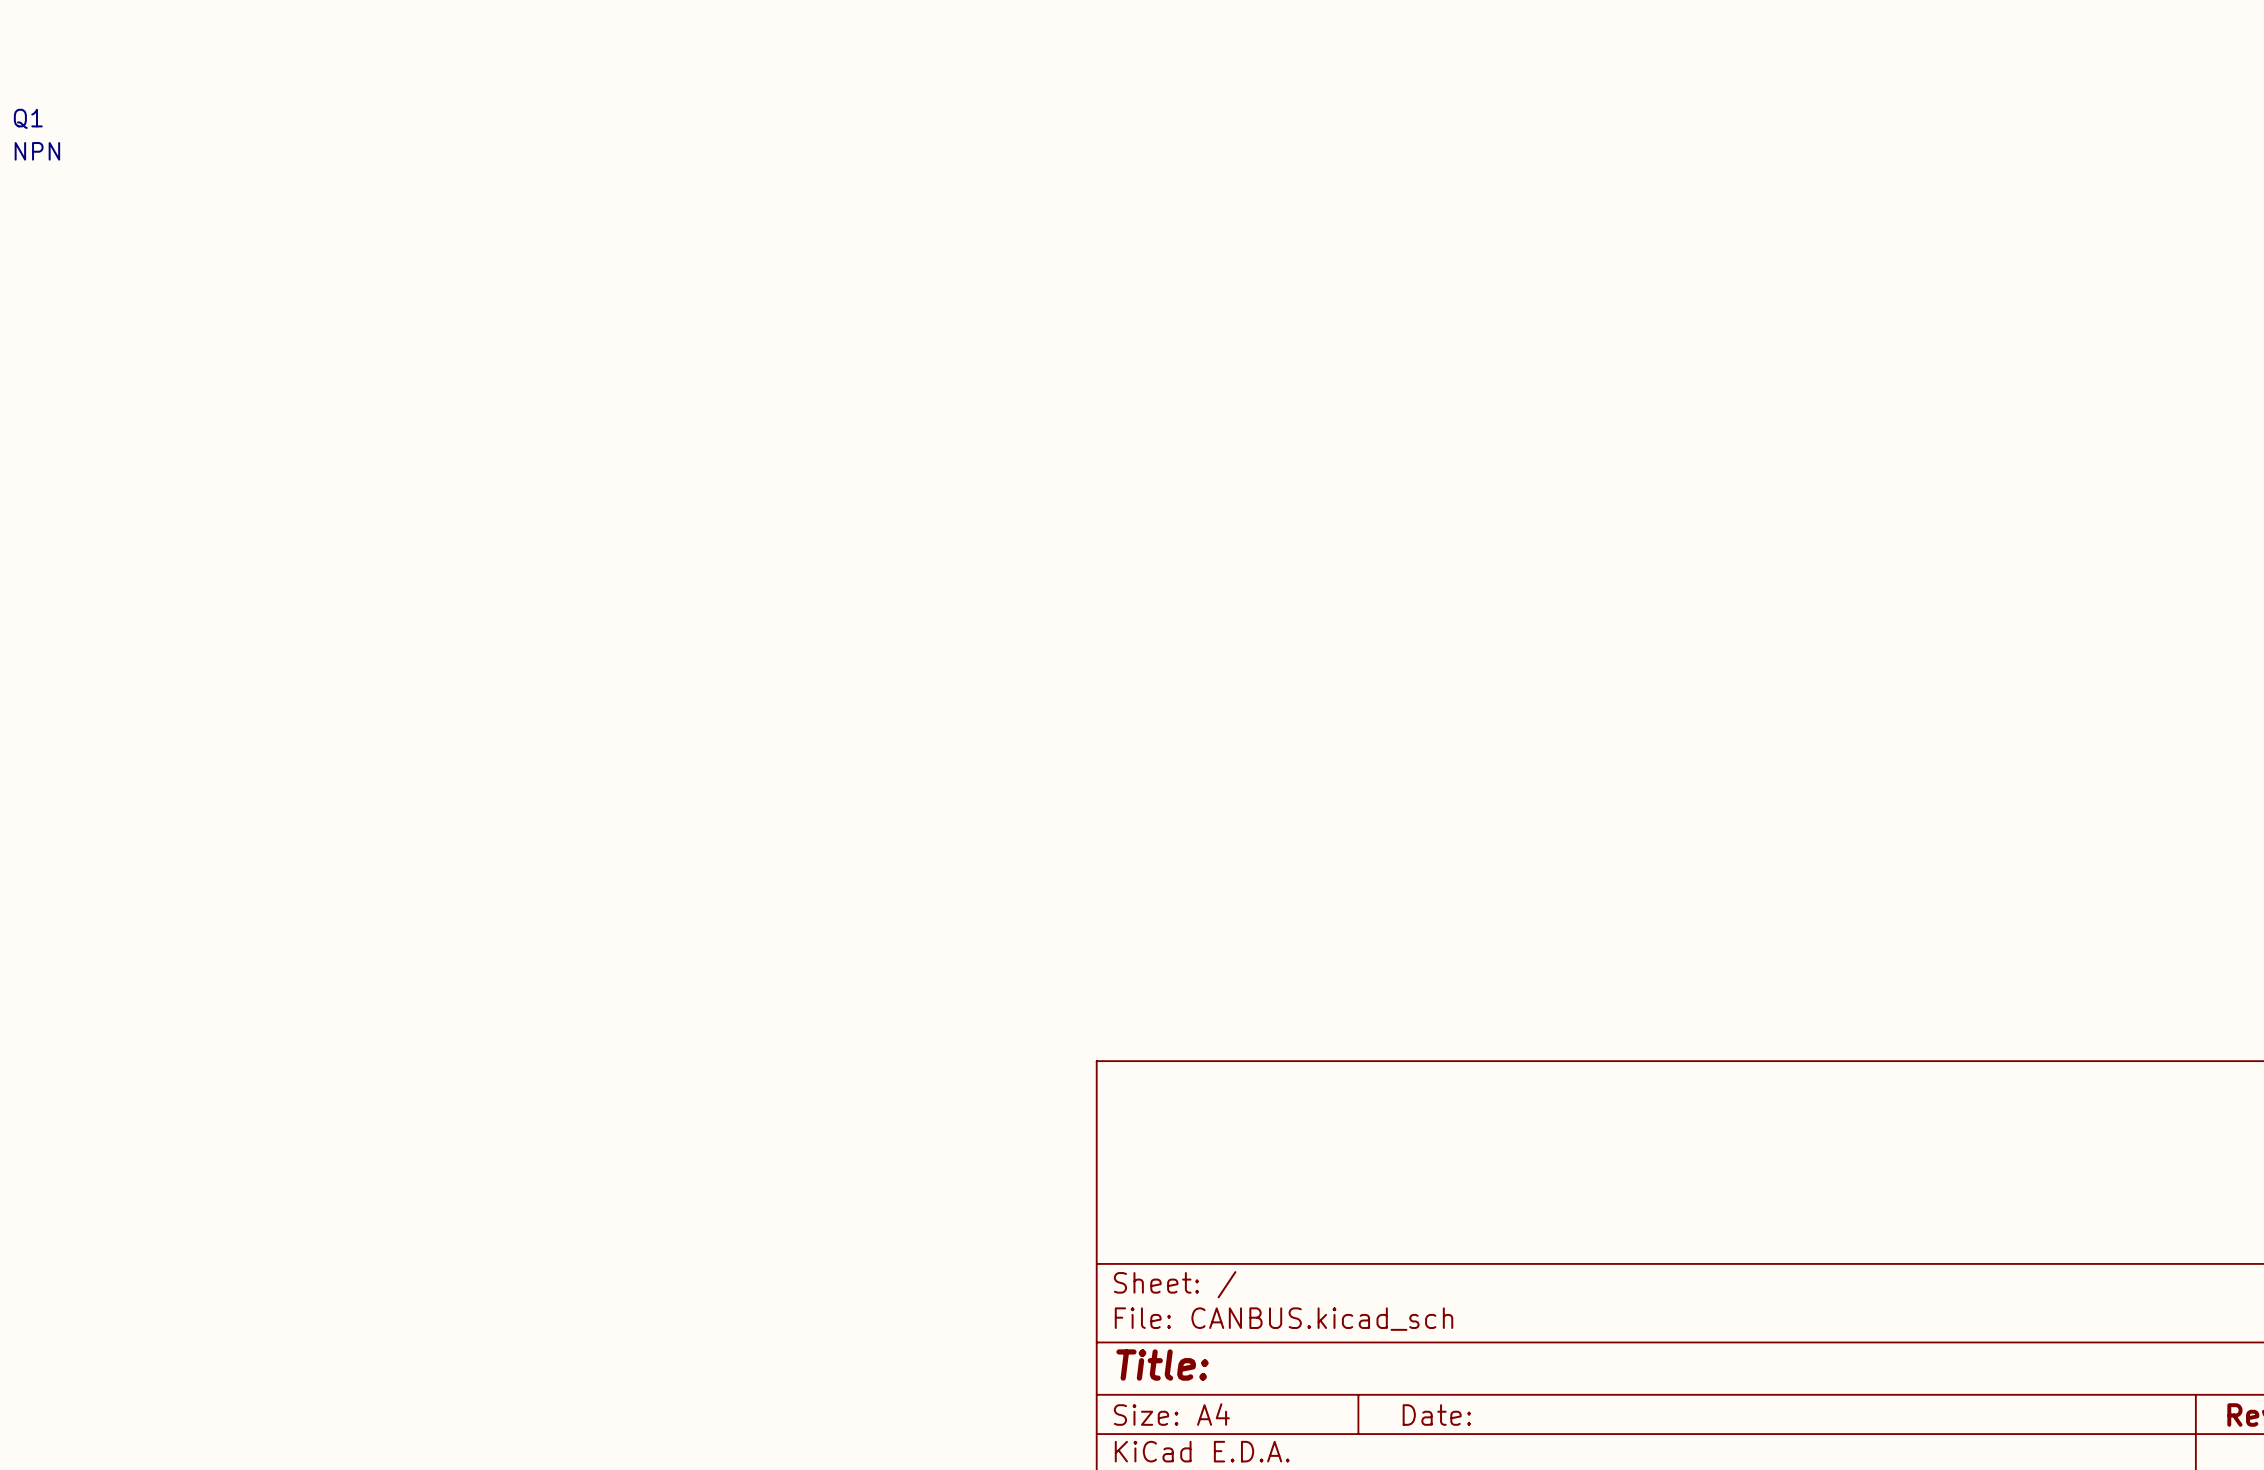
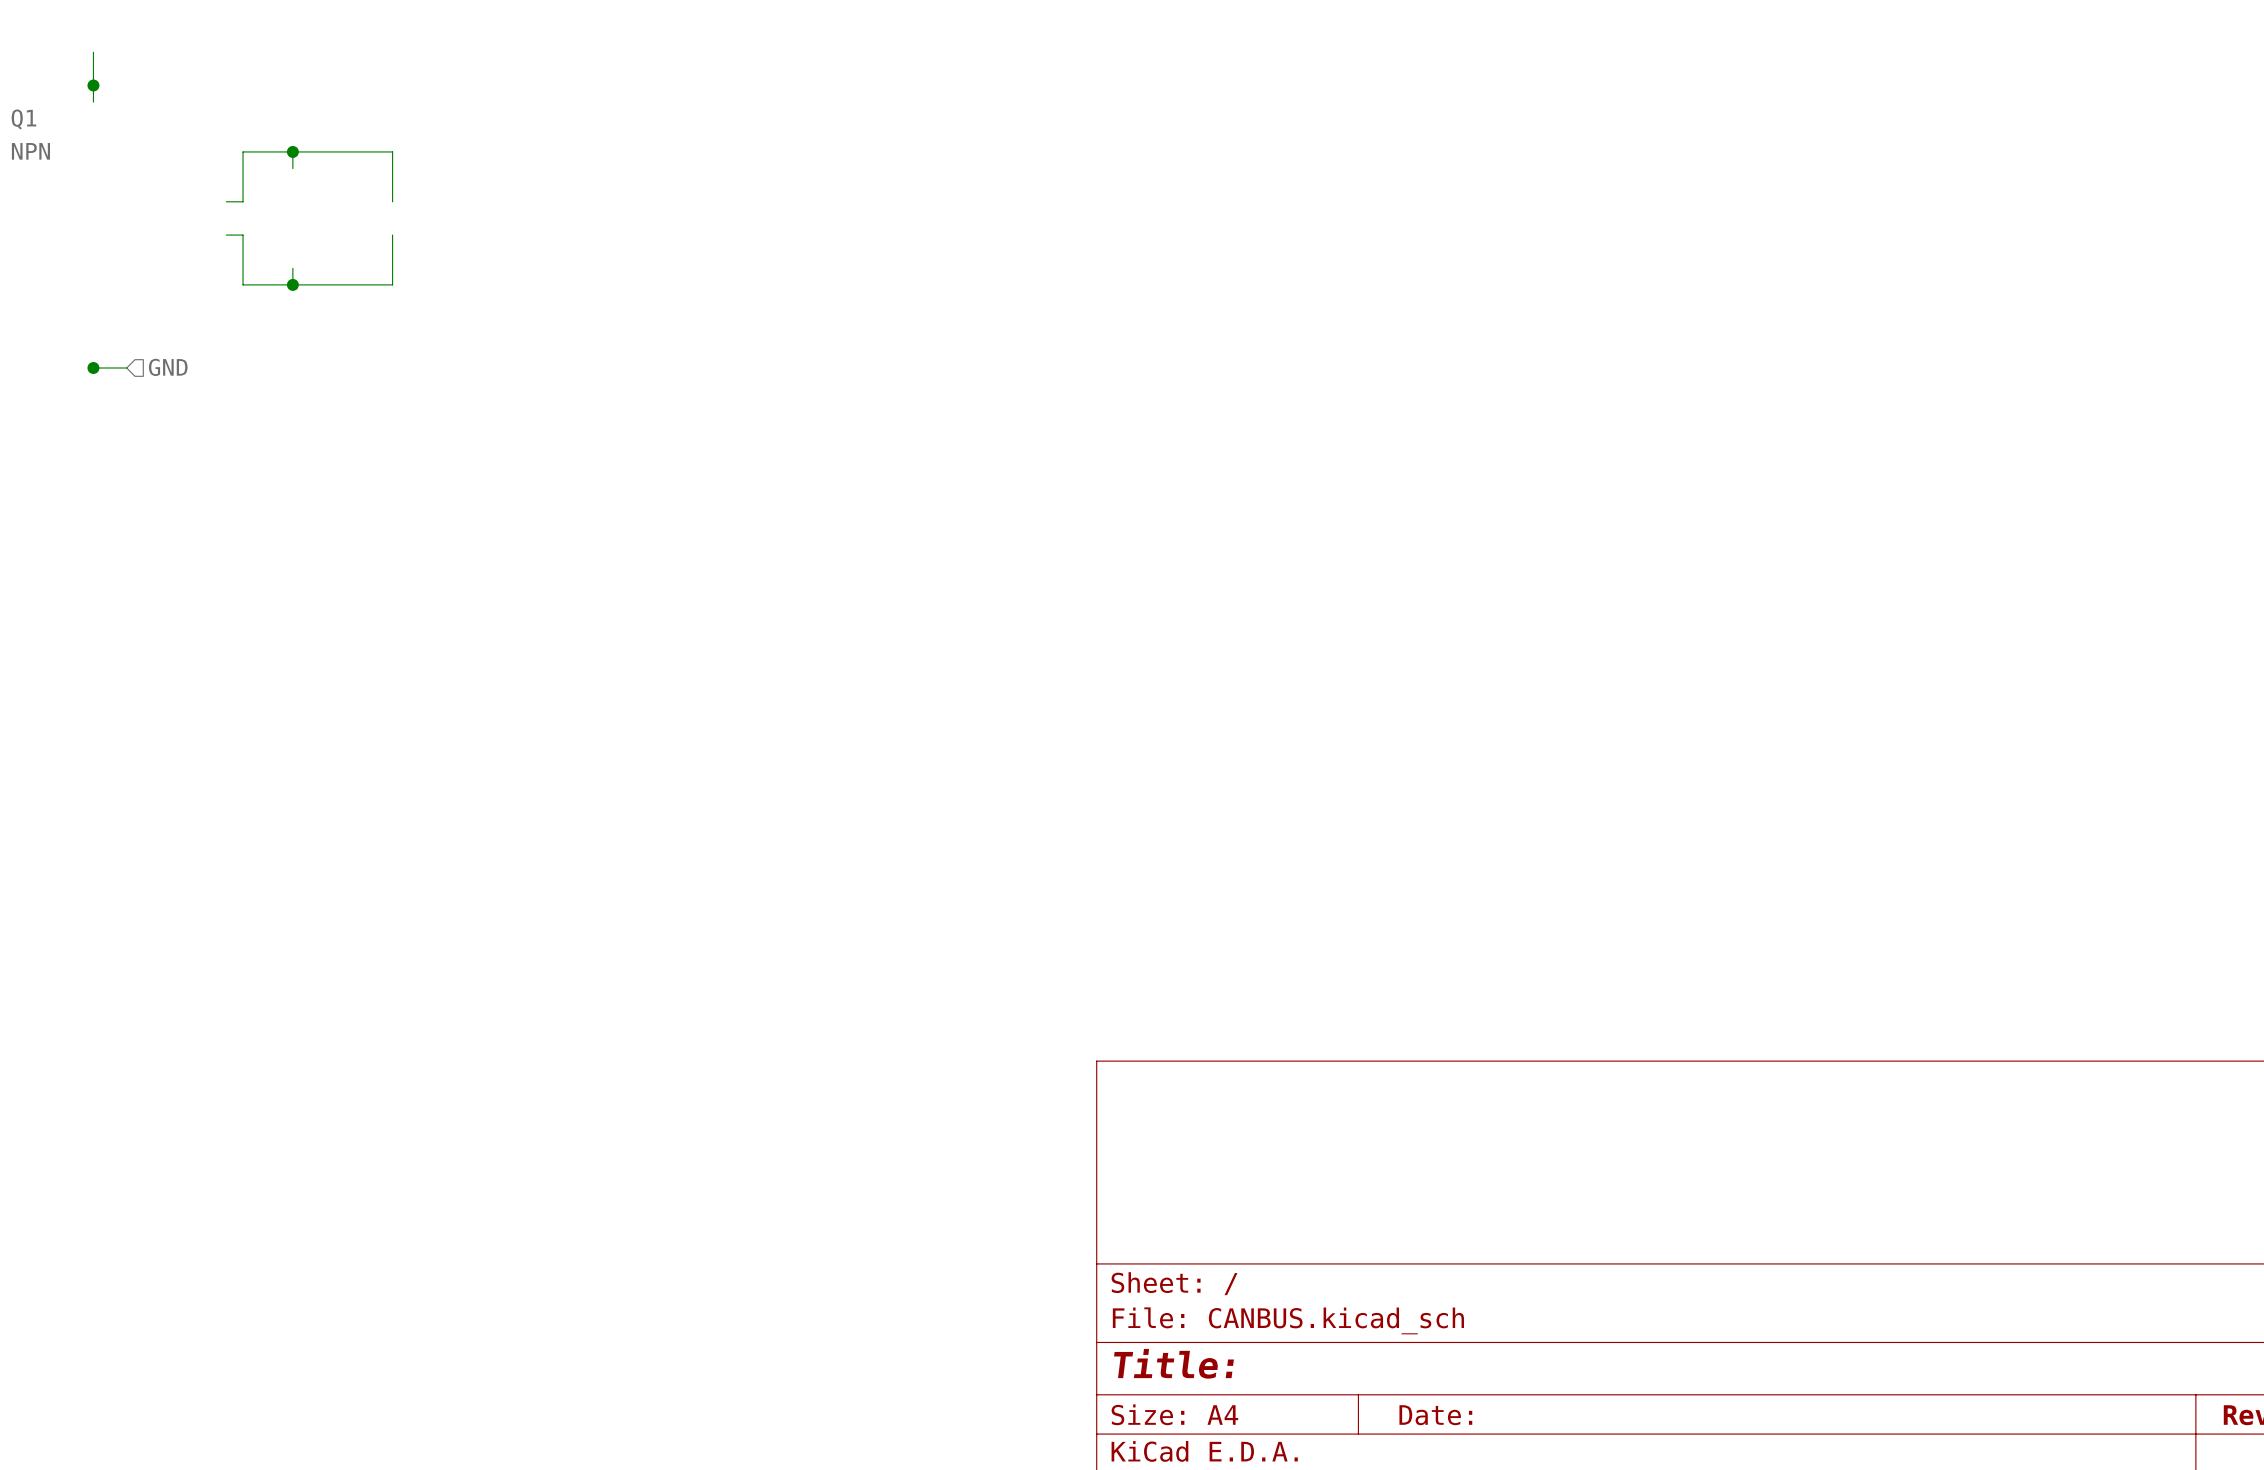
wire: none -> (93, 52) (93, 102)
junction: none -> (93, 85)
wire: none -> (292, 151) (292, 168)
junction: none -> (292, 151)
wire: none -> (226, 201) (243, 201) (243, 151) (392, 151) (392, 201)
wire: none -> (226, 235) (243, 235) (243, 284) (392, 284) (392, 235)
wire: none -> (292, 268) (292, 284)
junction: none -> (292, 284)
hierarchical label: none -> GND (168, 367)
wire: none -> (93, 368) (126, 368)
junction: none -> (93, 368)

